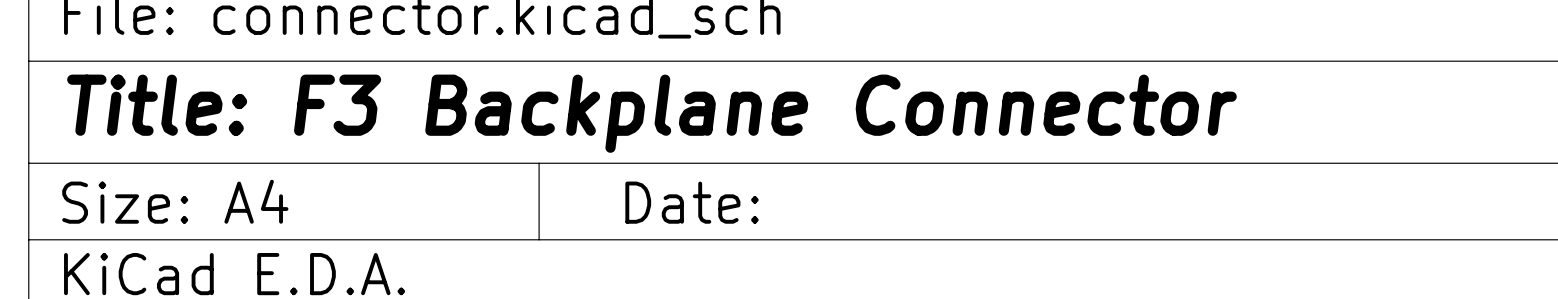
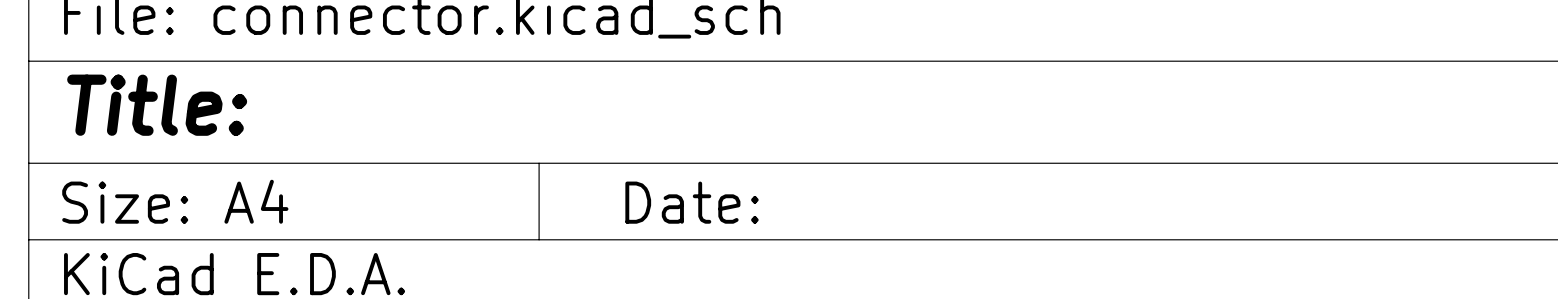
title block: Title: F3 Backplane Connector (651, 113) -> Title: (157, 105)

